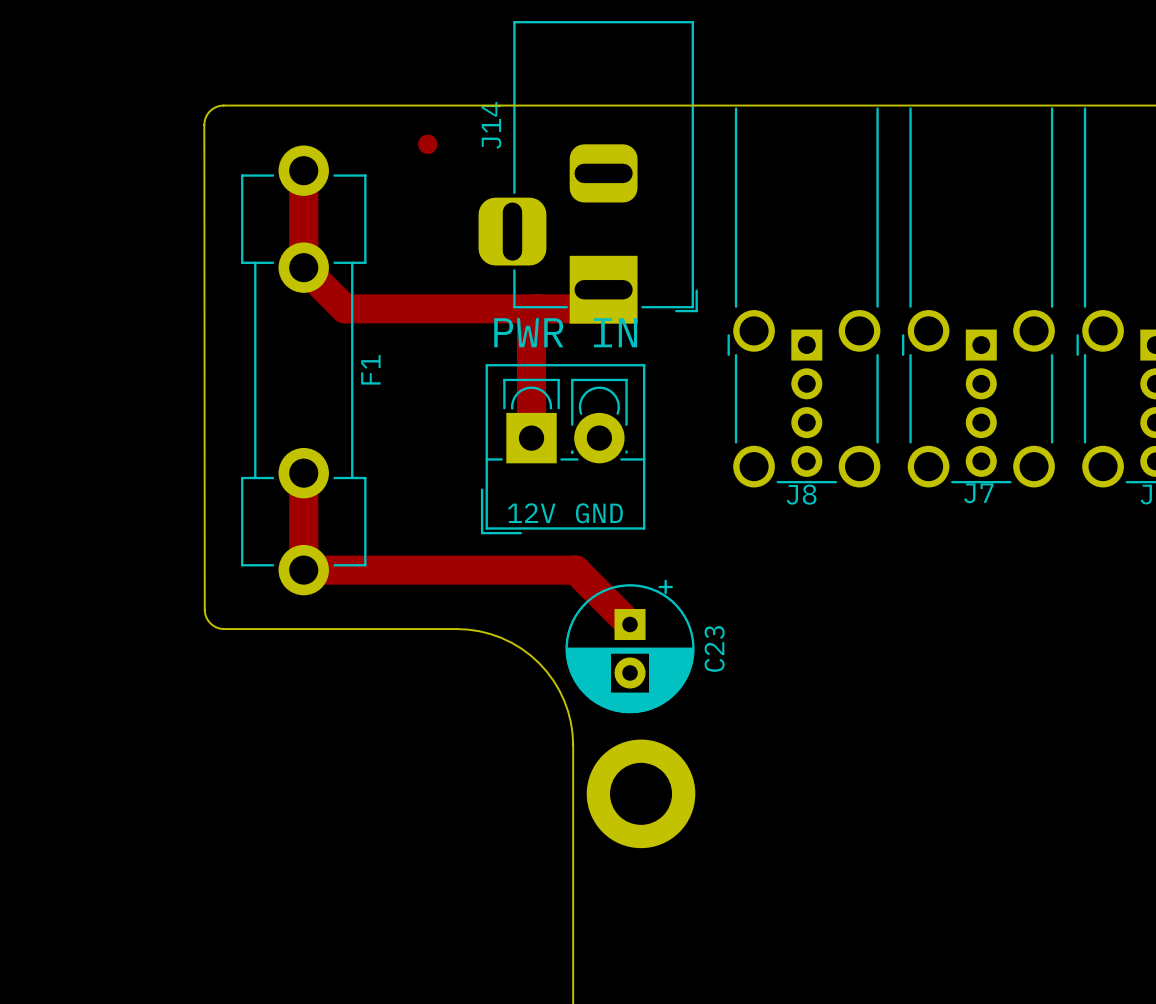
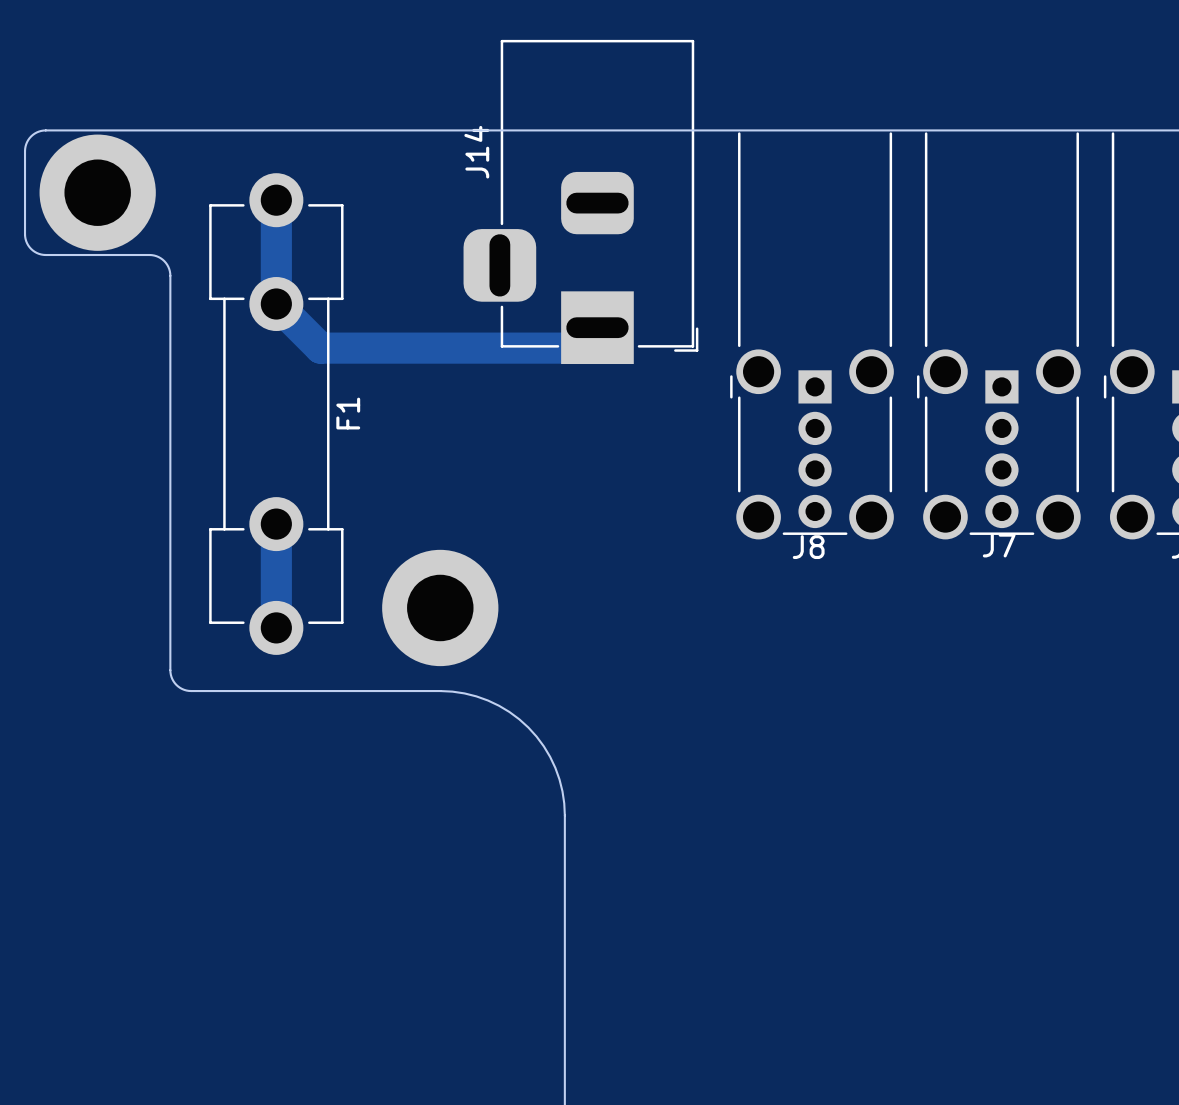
board edge: (223, 105) (210, 111) (204, 124) (204, 609) -> (190, 130) (43, 130) (31, 136) (26, 144) (25, 151) (25, 236) (28, 245) (32, 250) (45, 255) (151, 255) (164, 261) (169, 271) (170, 670)
part: (427, 144) -> none
part: none -> (97, 192)
track: (537, 308) (531, 315) (531, 438) -> none
part: (563, 449) -> none
track: (303, 570) (575, 570) (630, 624) -> none
C23: (630, 646) -> none
part position: (641, 793) -> (440, 607)

